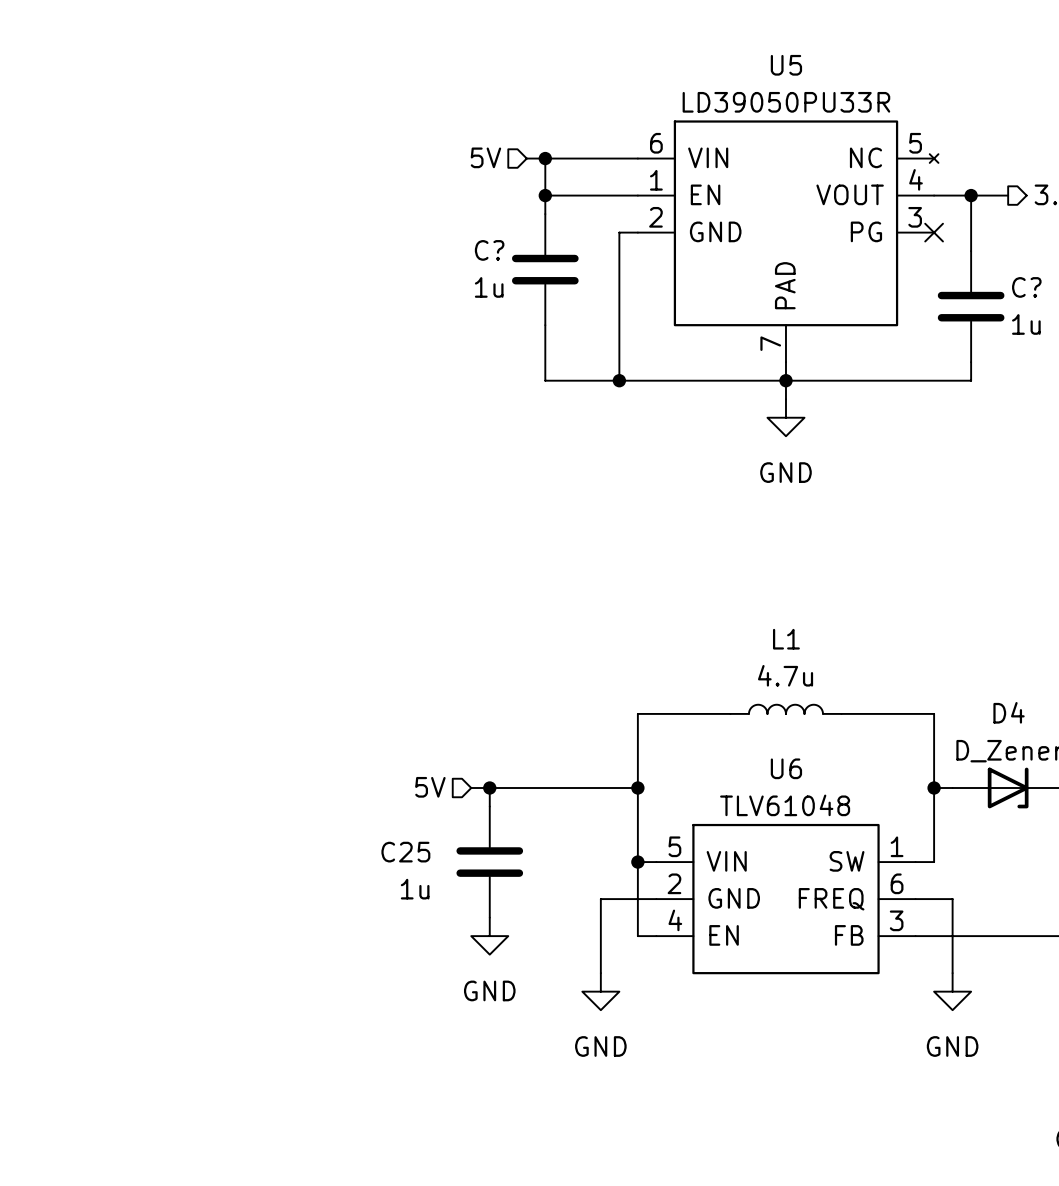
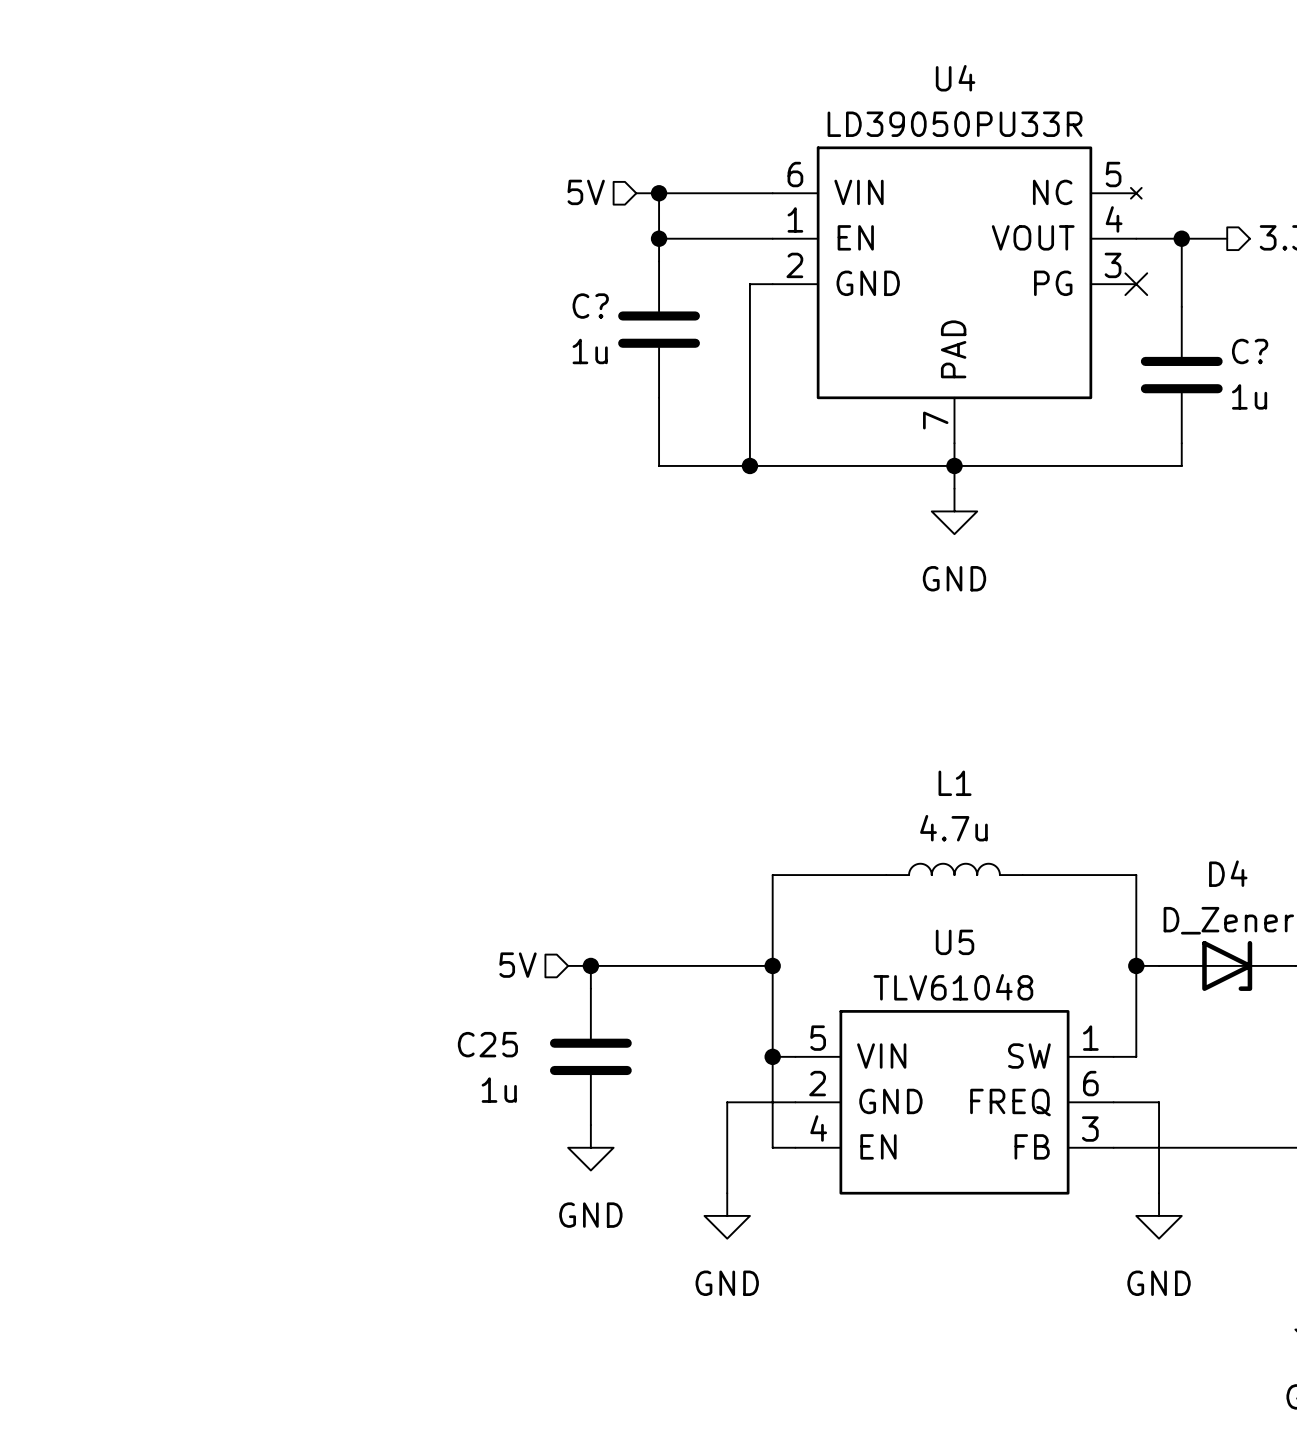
U5 name: U5 (786, 65) -> U4 (955, 78)
U6 name: U6 (786, 768) -> U5 (955, 942)

